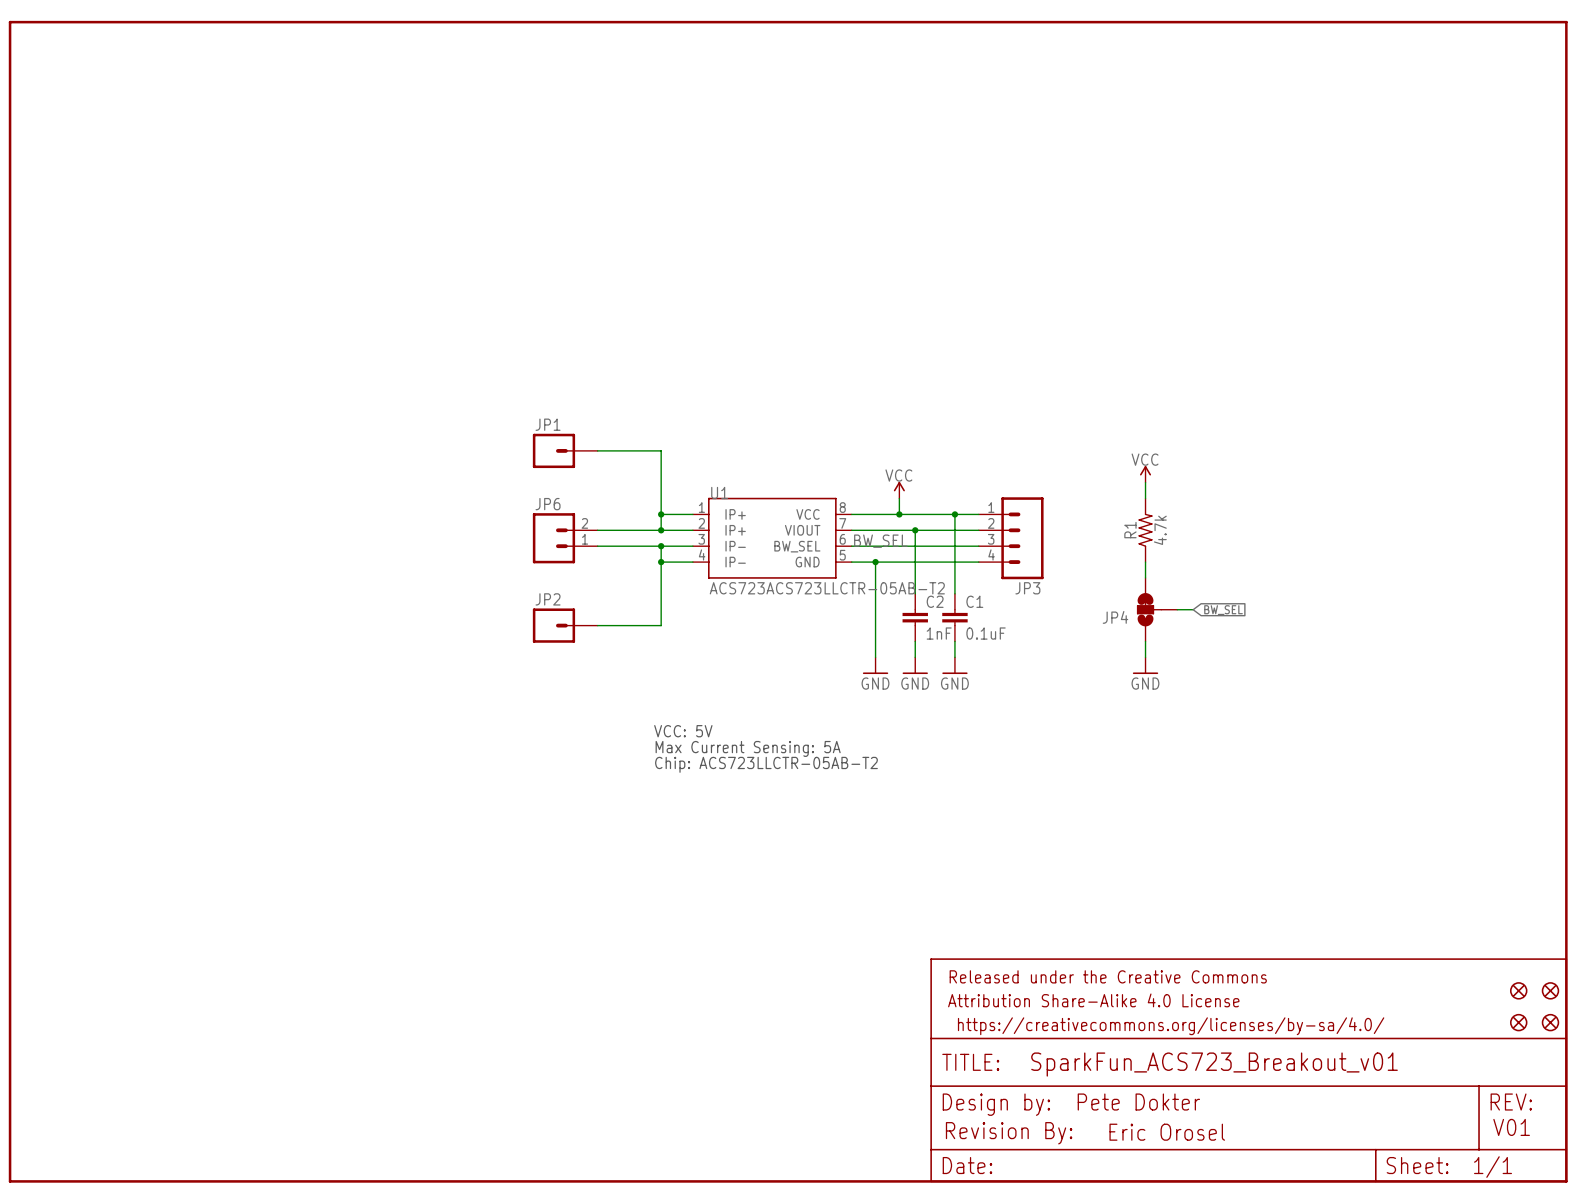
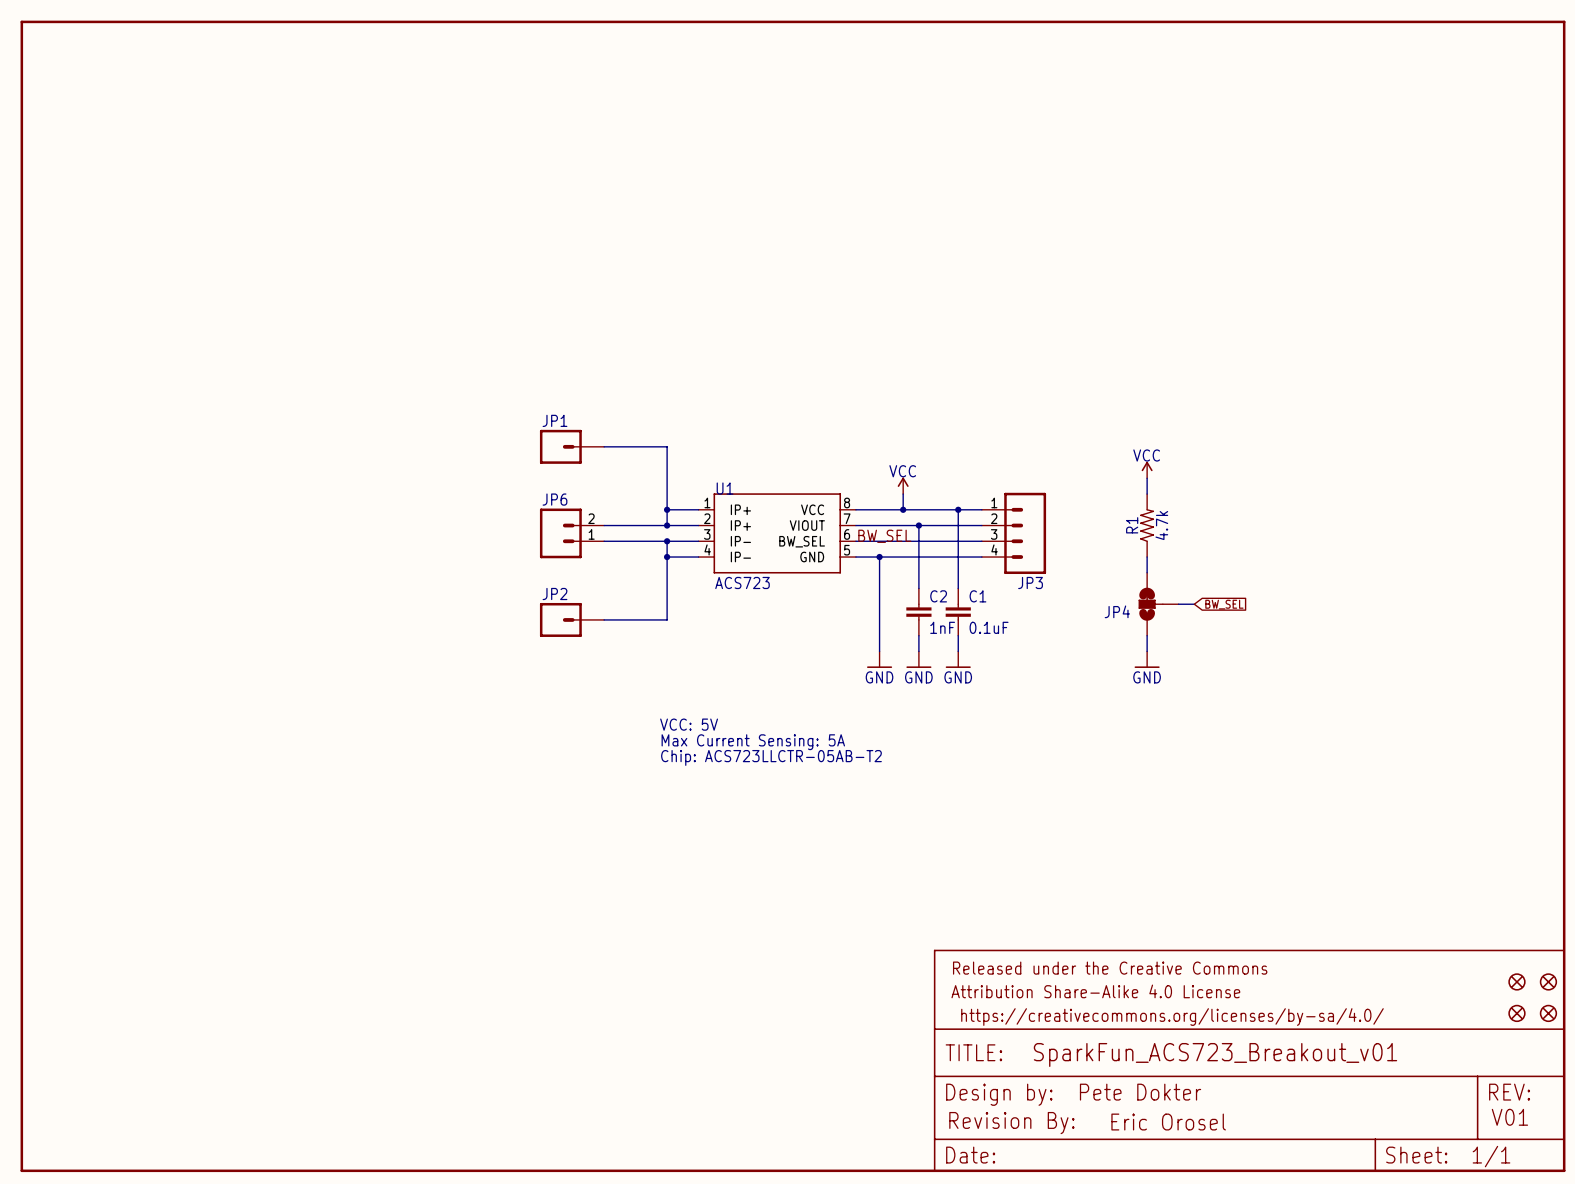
U1 value: ACS723ACS723LLCTR-05AB-T2 (827, 588) -> ACS723 (742, 582)

